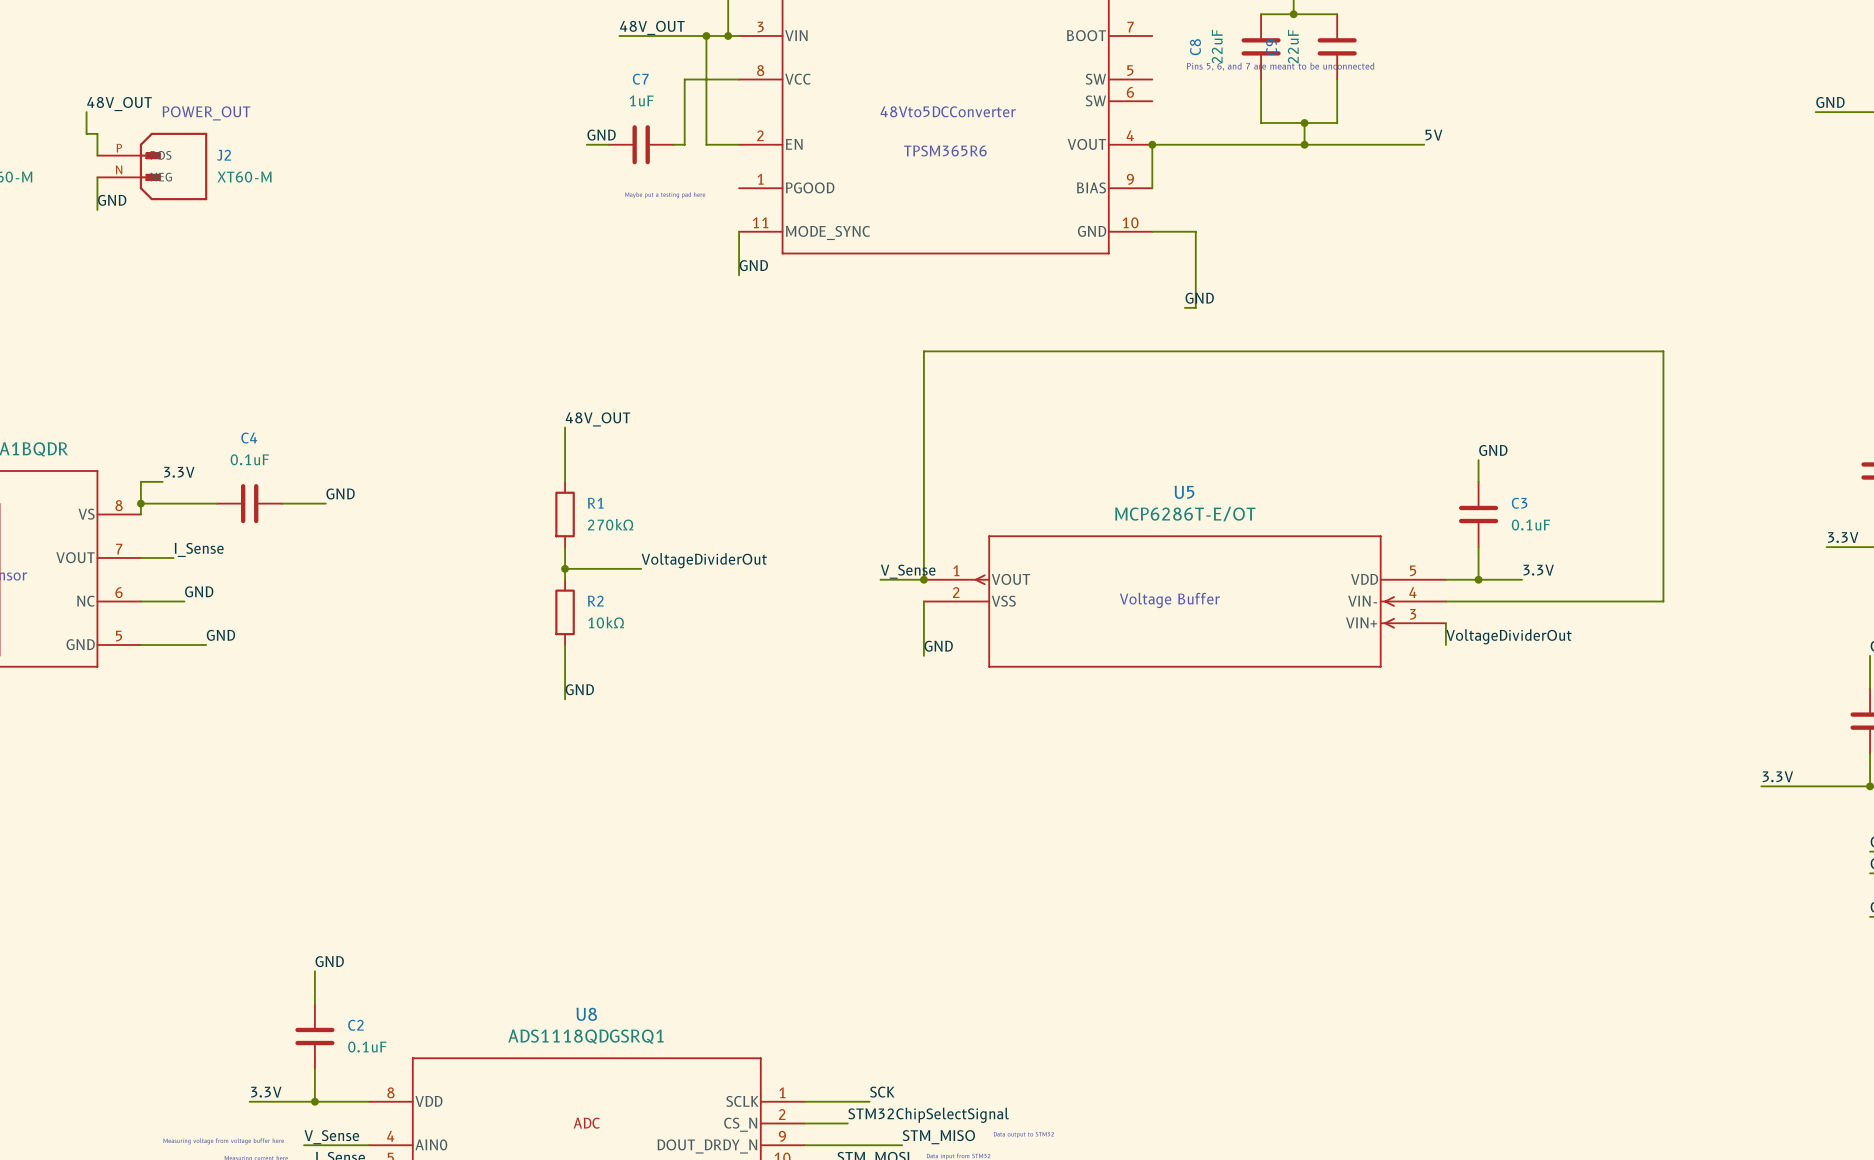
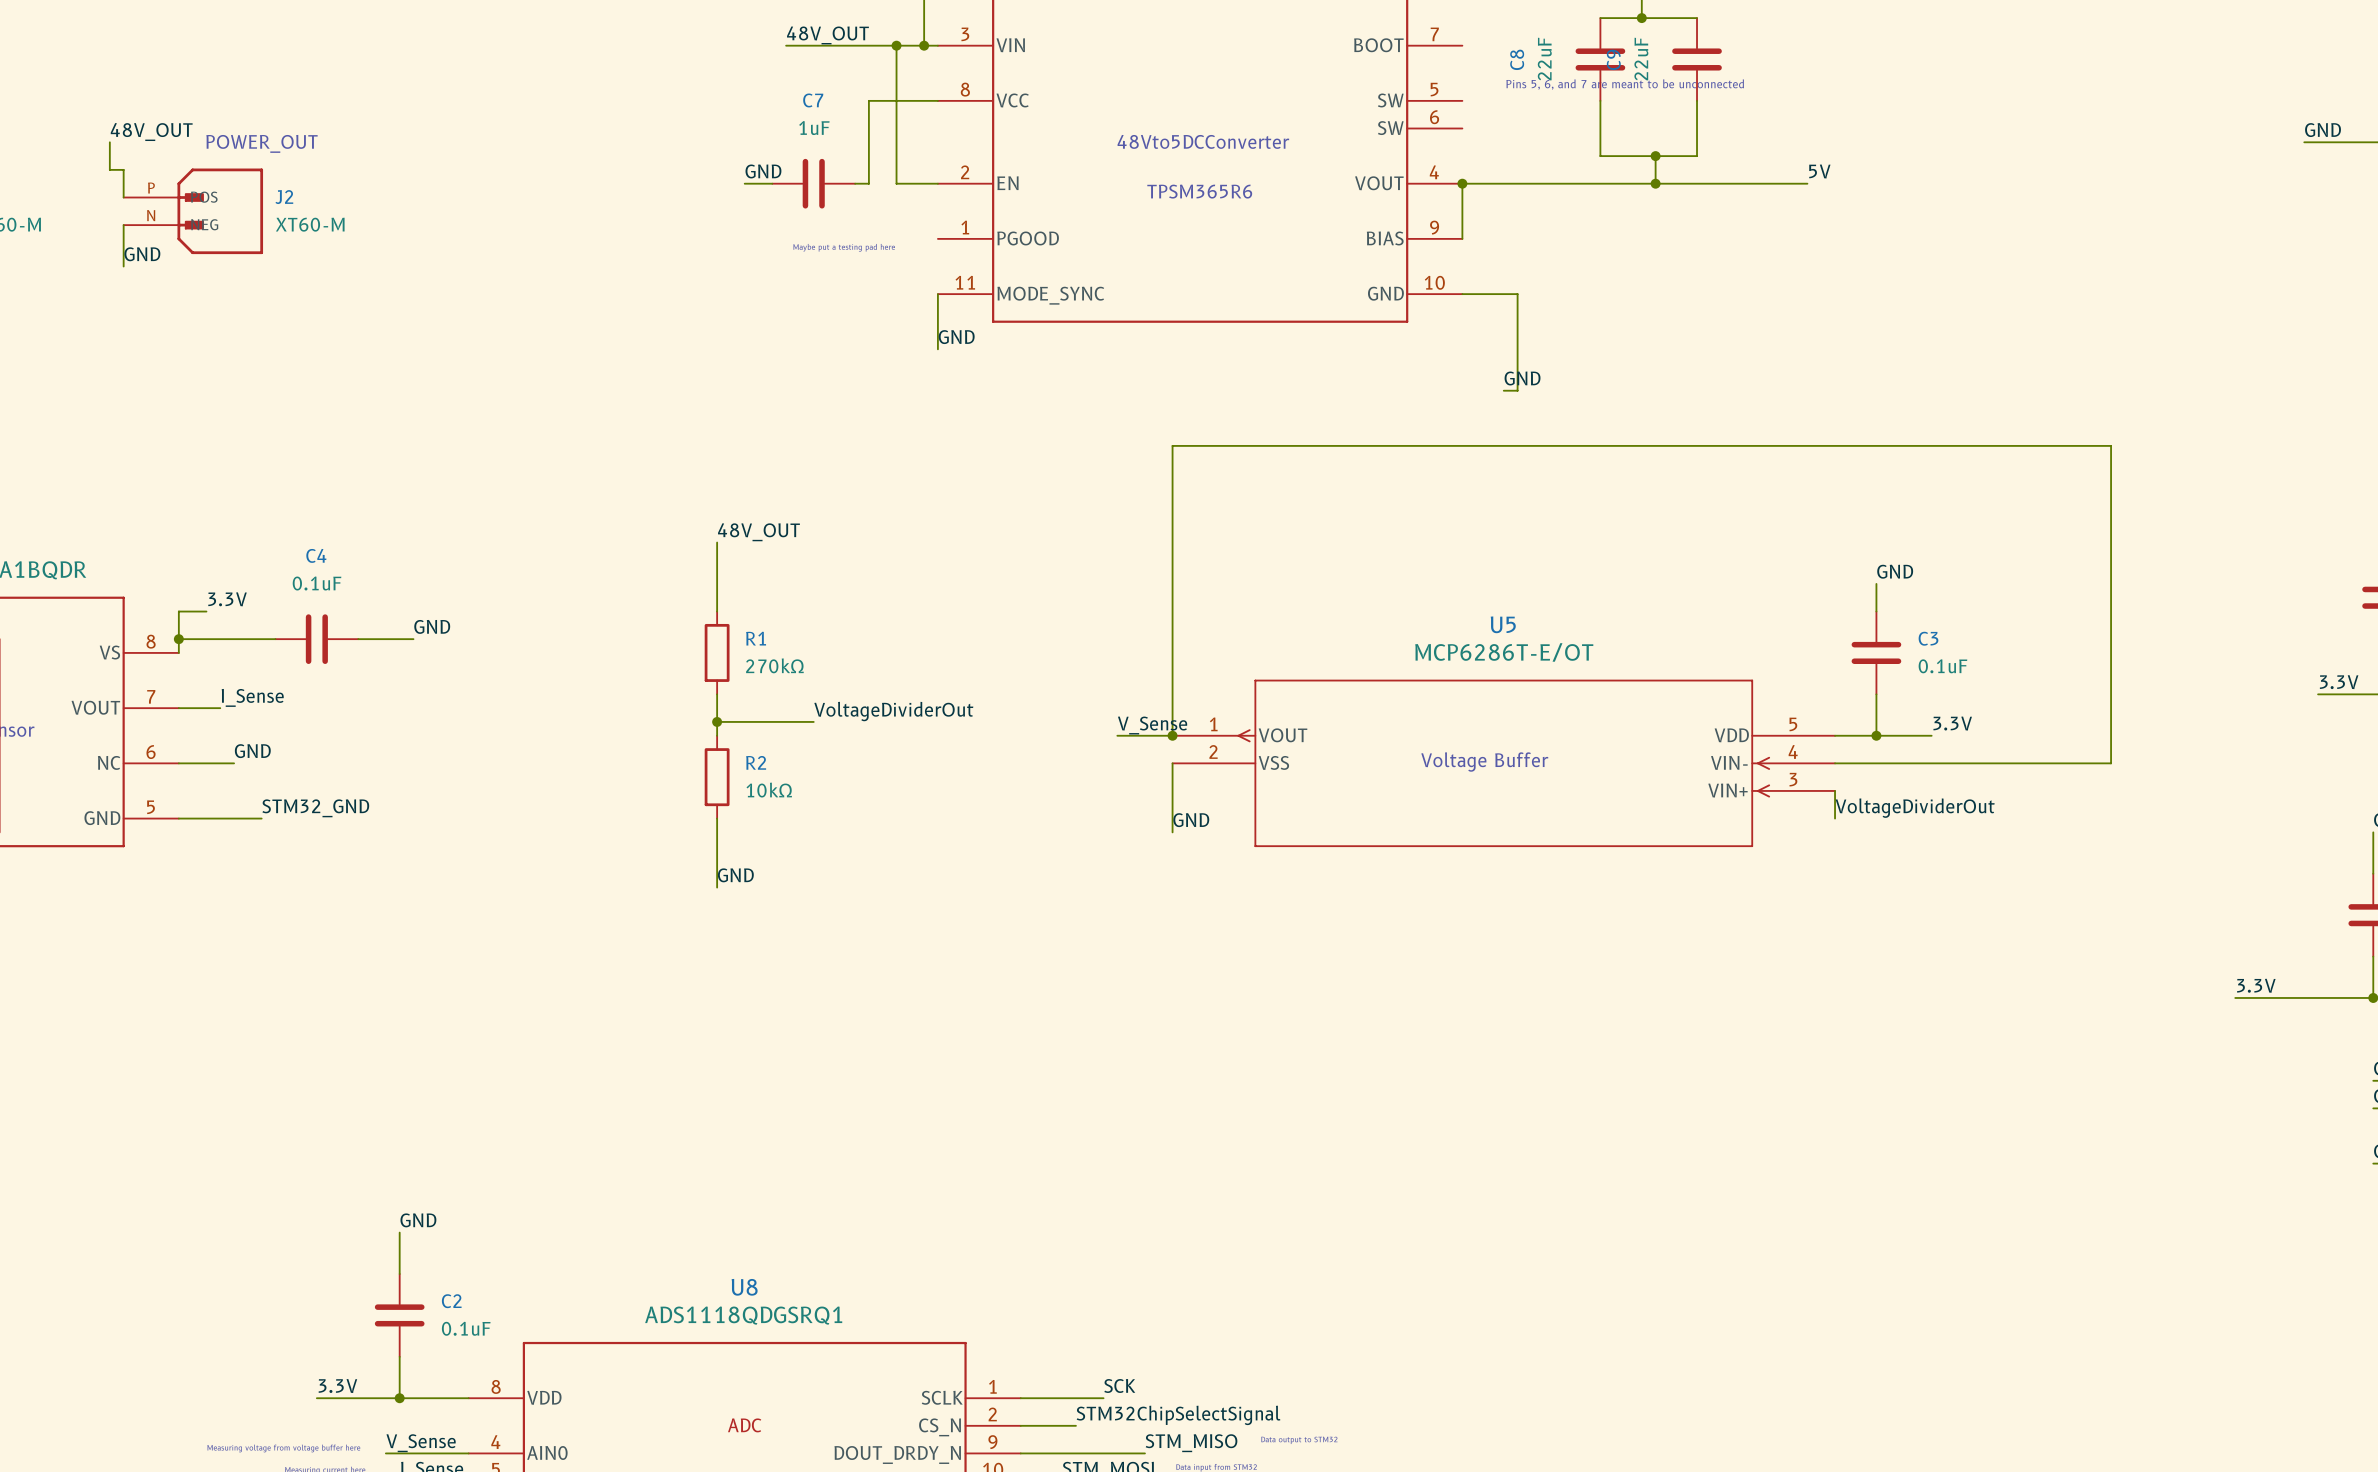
label: GND (220, 635) -> STM32_GND (315, 808)

